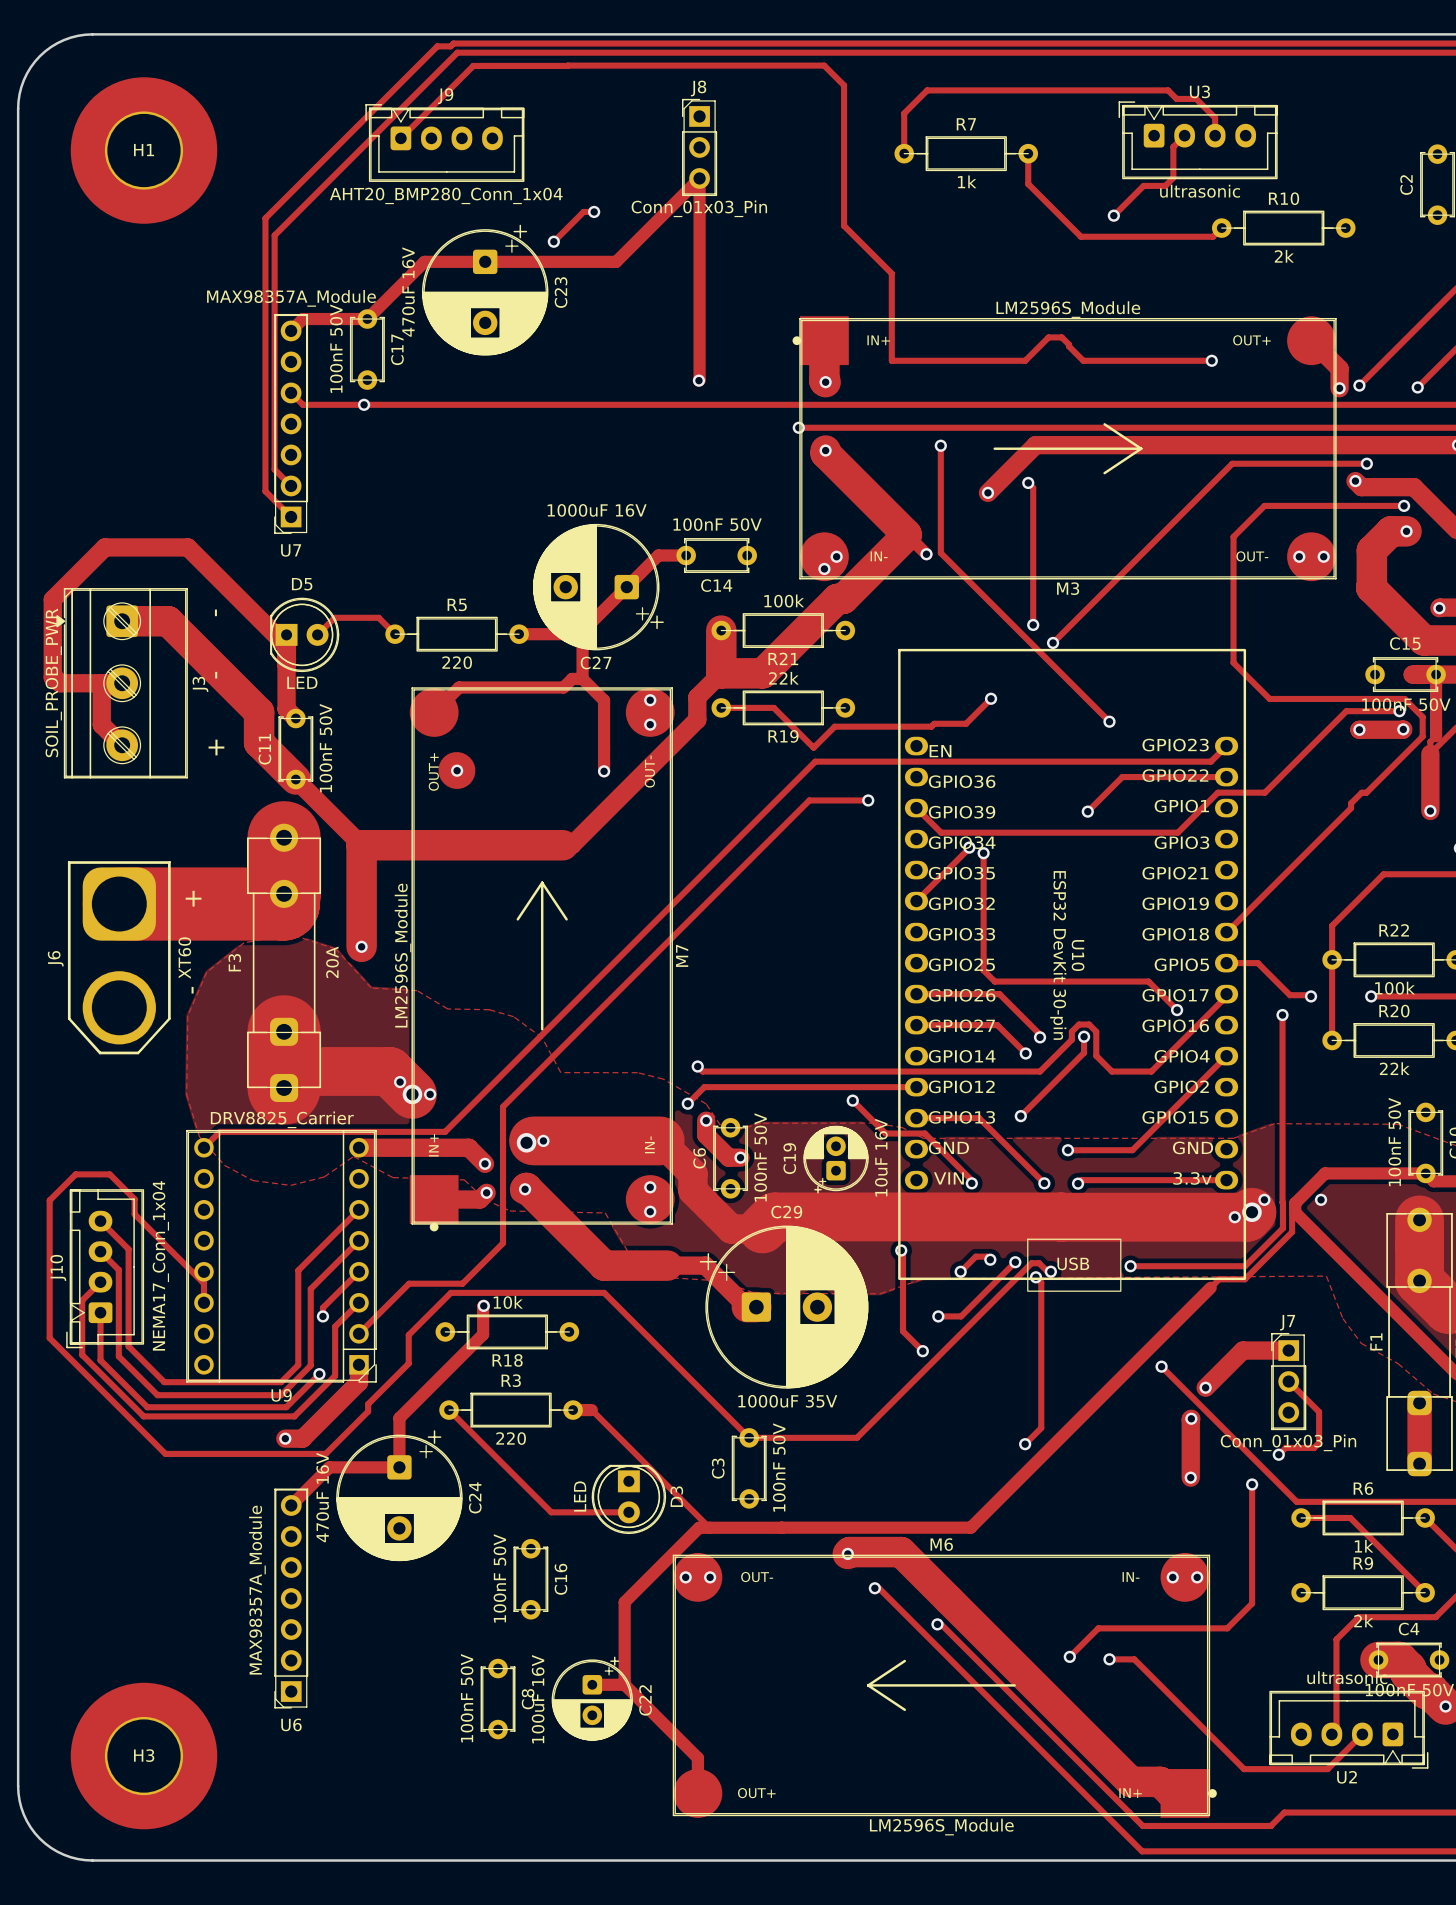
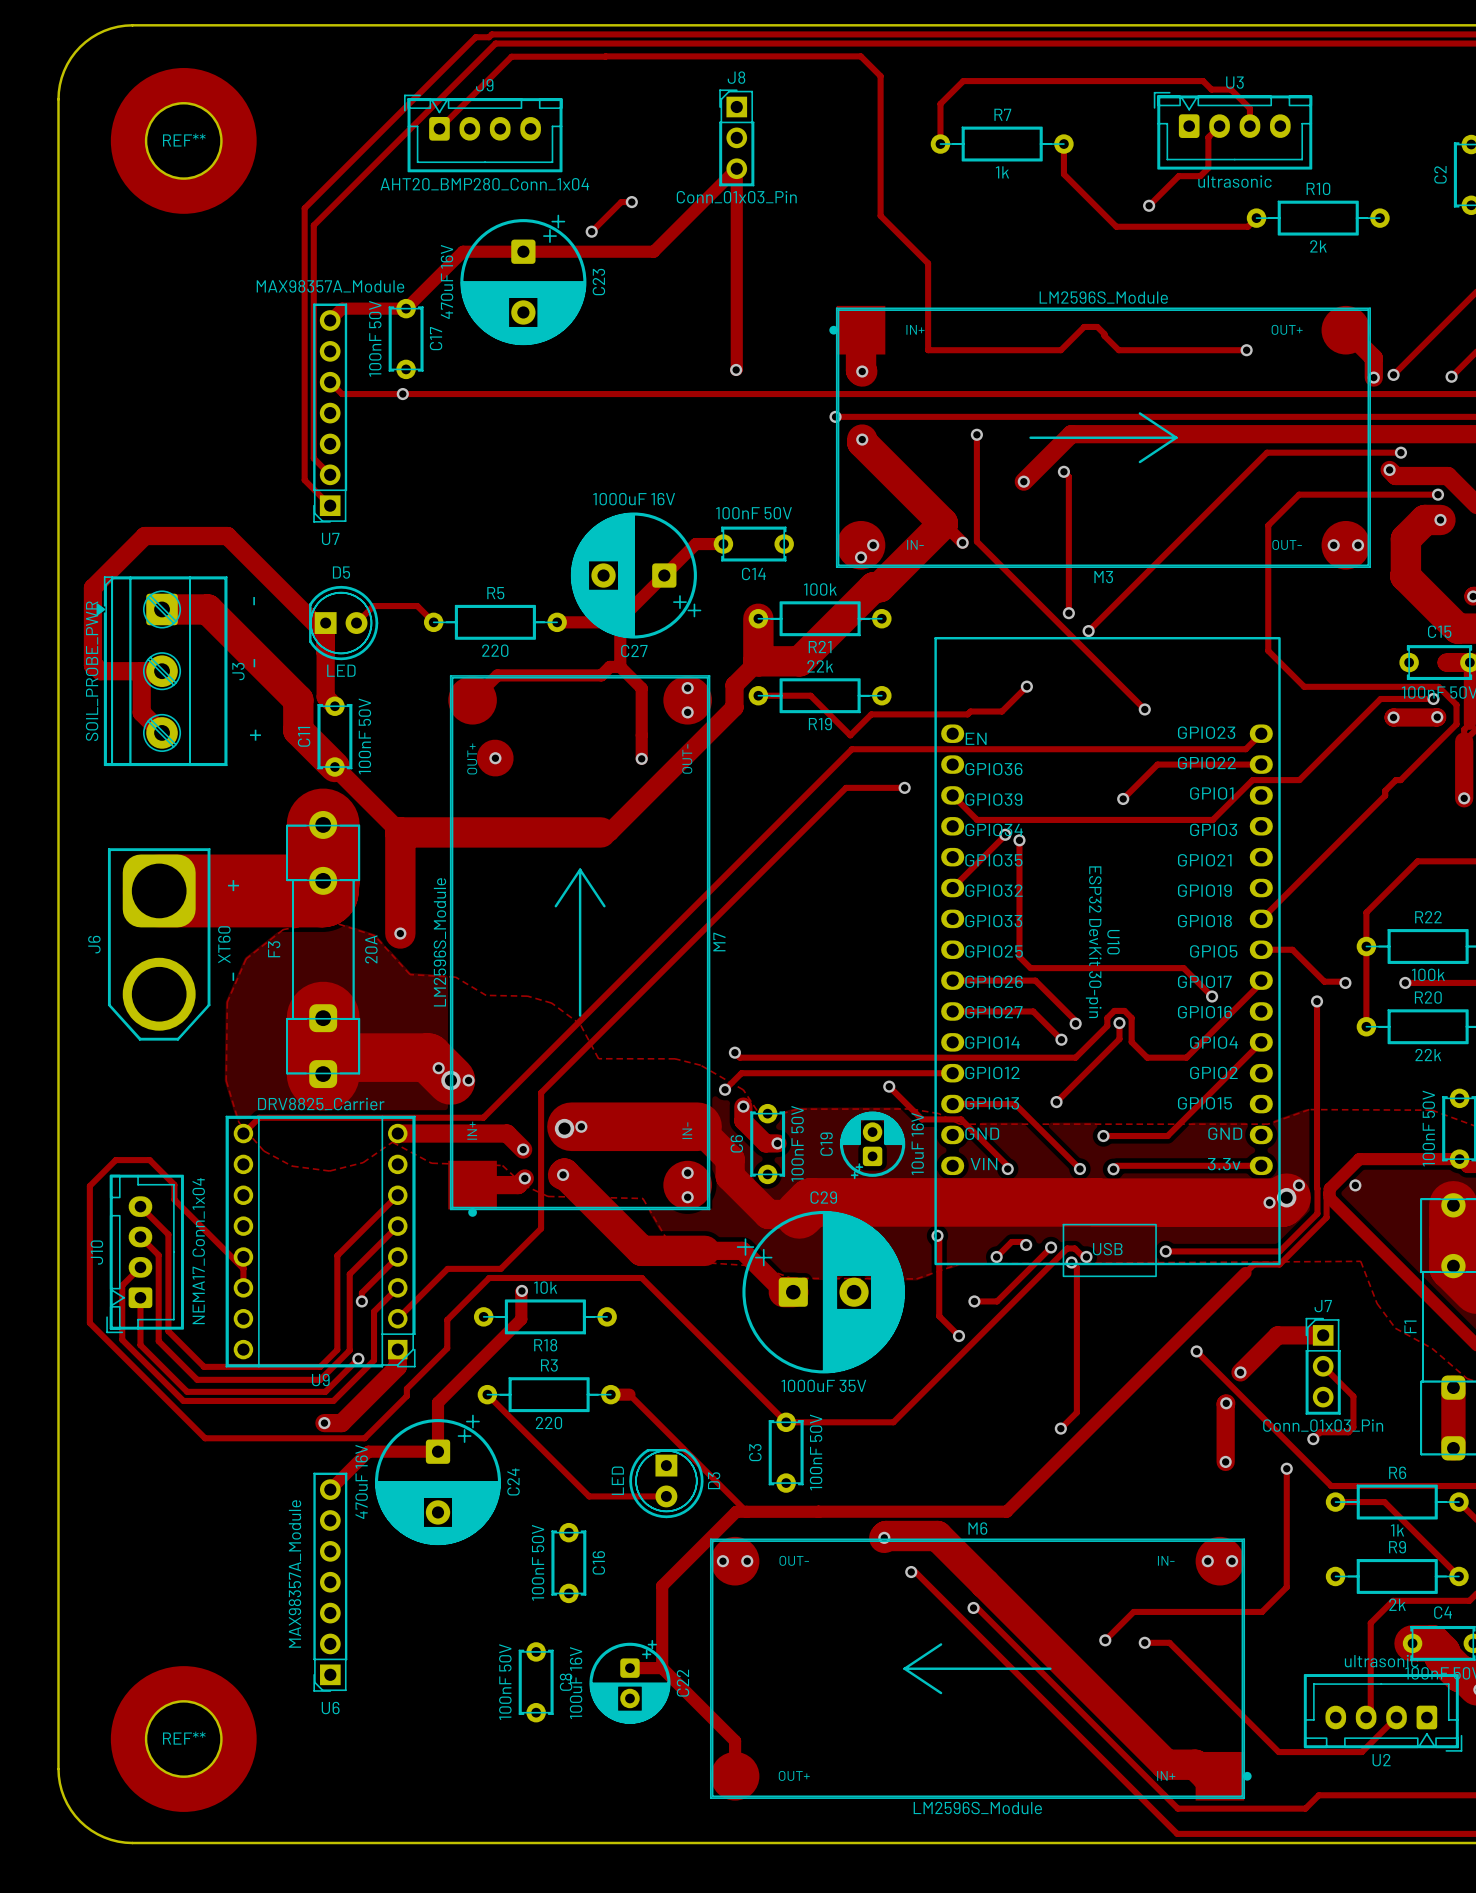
H1 name: H1 (144, 150) -> REF** (184, 140)
H3 name: H3 (144, 1755) -> REF** (184, 1738)

